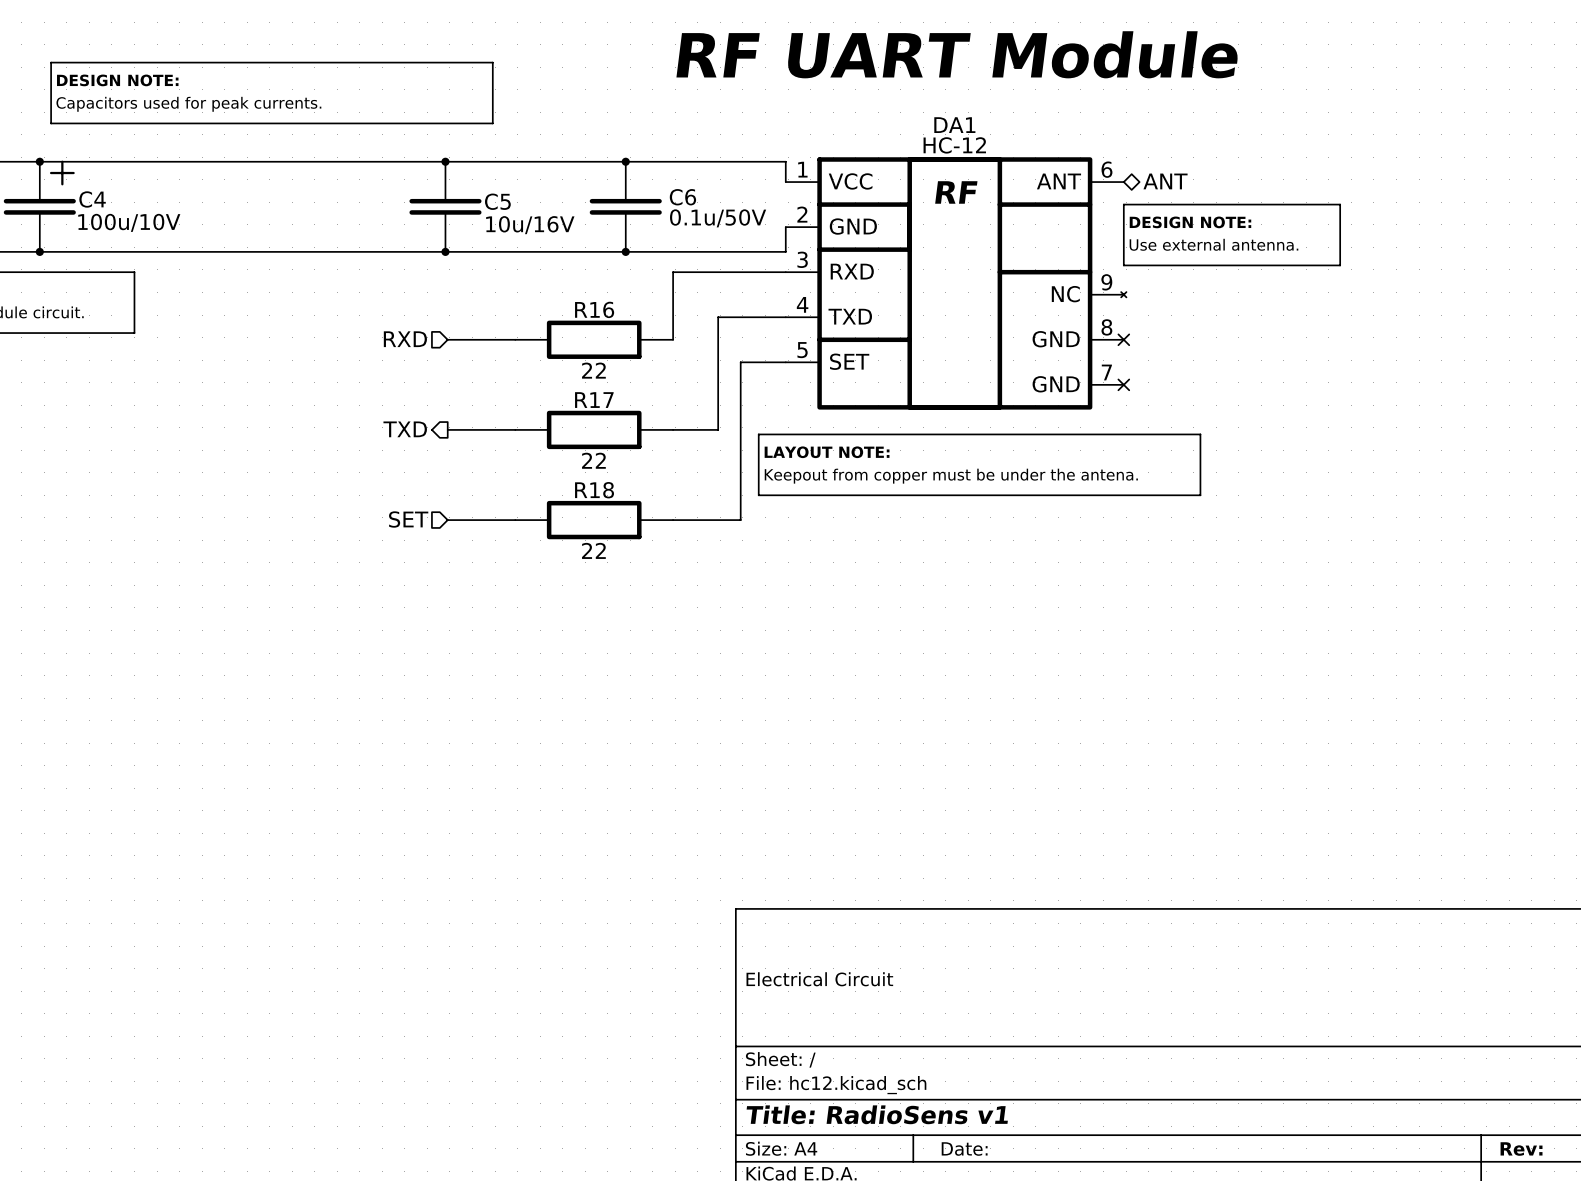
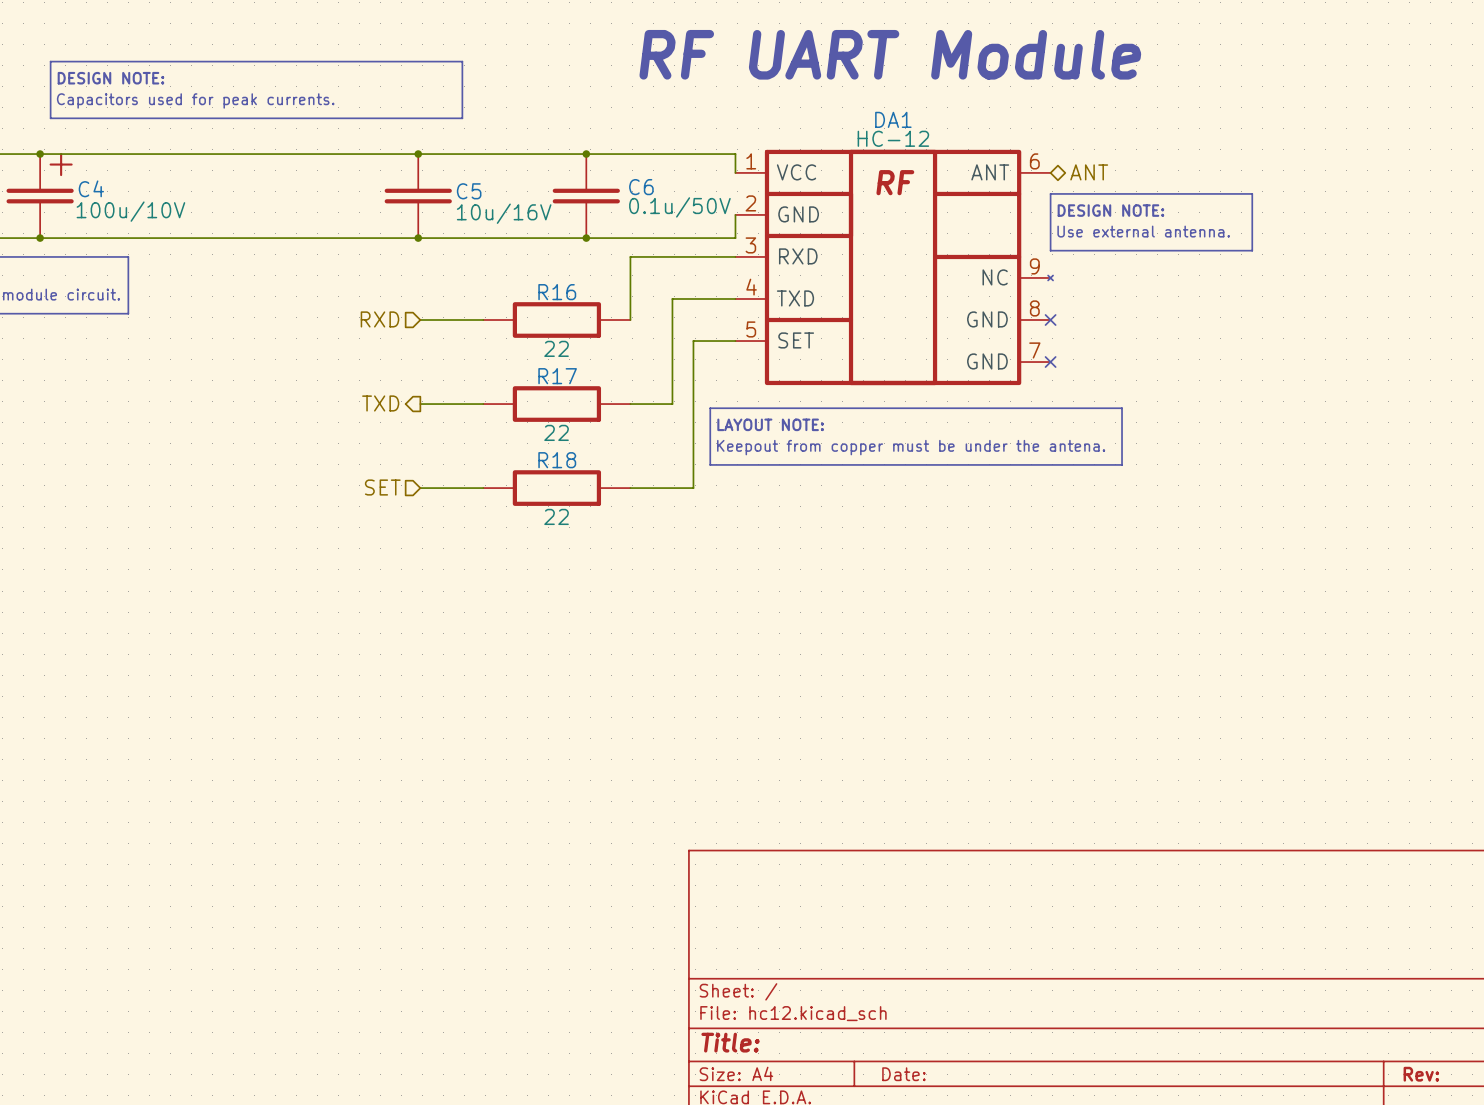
title block: Electrical Circuit (819, 979) -> none
title block: Title: RadioSens v1 (877, 1114) -> Title: (730, 1042)

